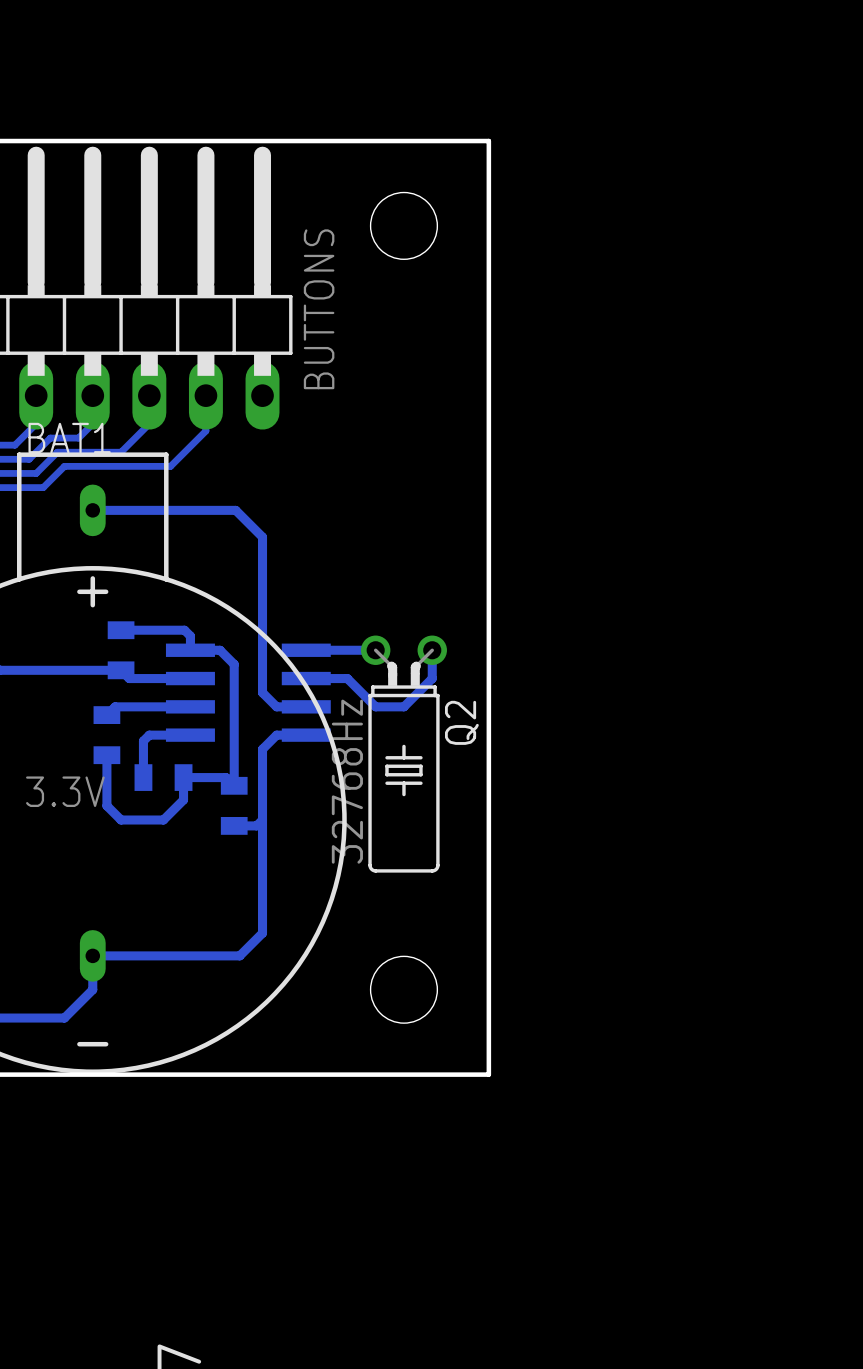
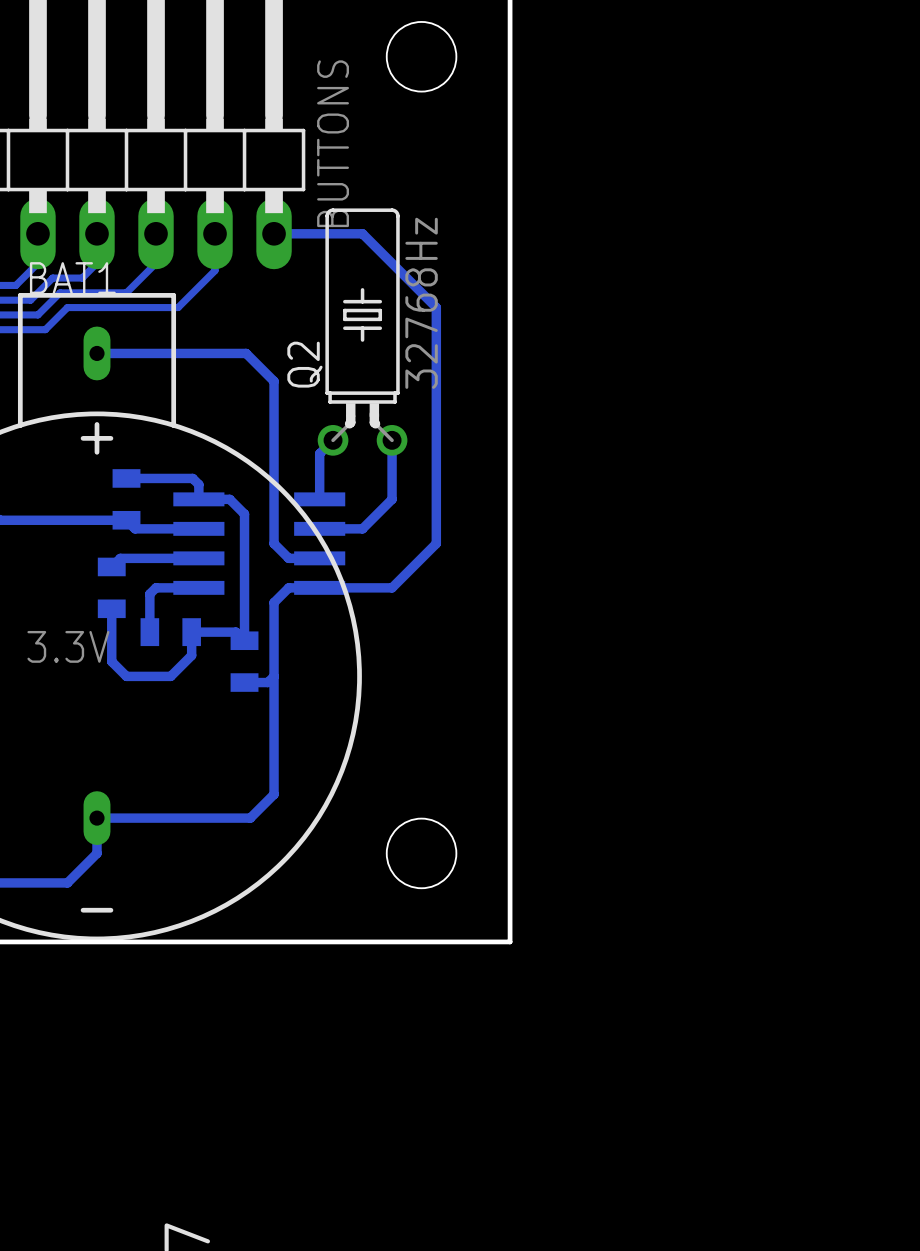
bottom track: none -> (392, 440) (392, 499) (362, 528)
bottom track: (306, 650) (375, 650) -> (319, 499) (319, 453) (333, 440)
bottom track: (432, 650) (432, 678) (418, 692) -> (274, 233) (362, 233) (436, 307) (436, 543)
bottom track: (347, 678) (375, 706) (403, 706) -> (319, 587) (392, 587) (421, 558)
Q2 rotation: 0° (403, 754) -> 180° (362, 332)
Q2 position: (403, 754) -> (362, 332)

